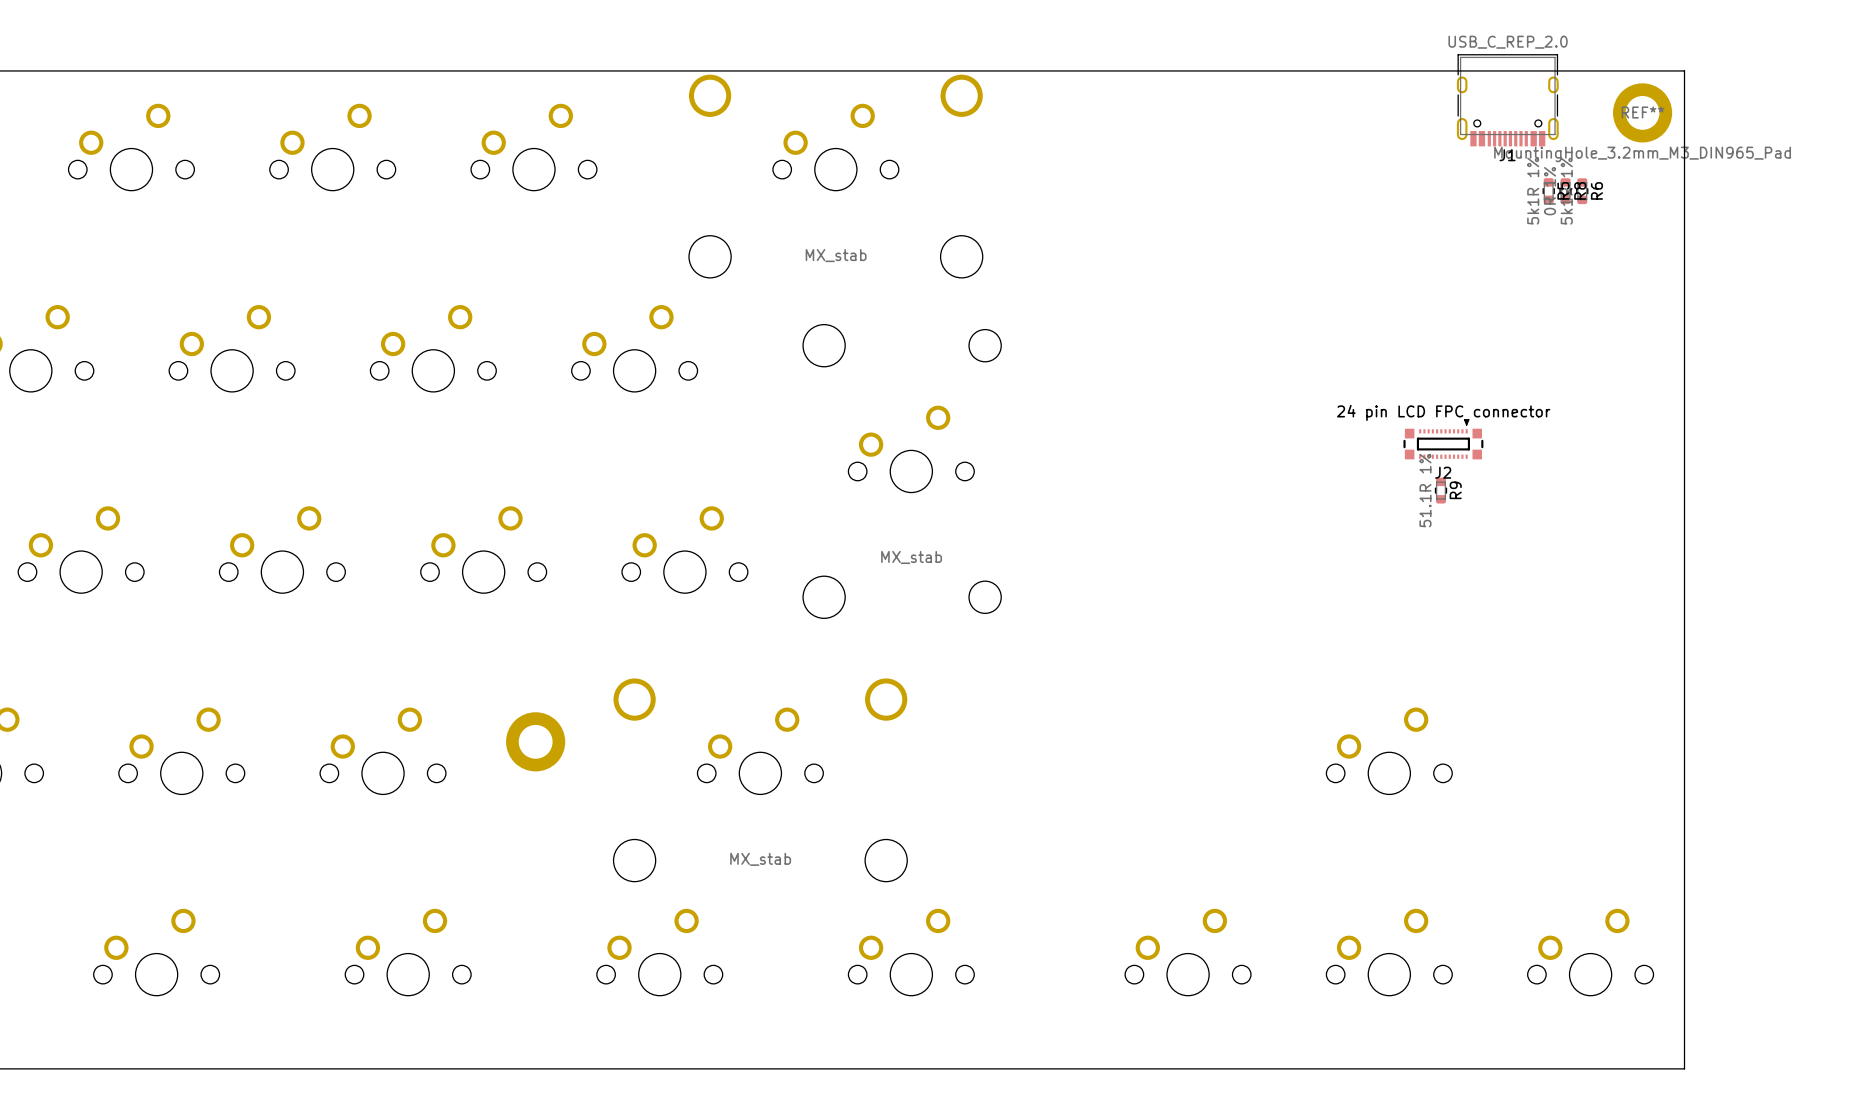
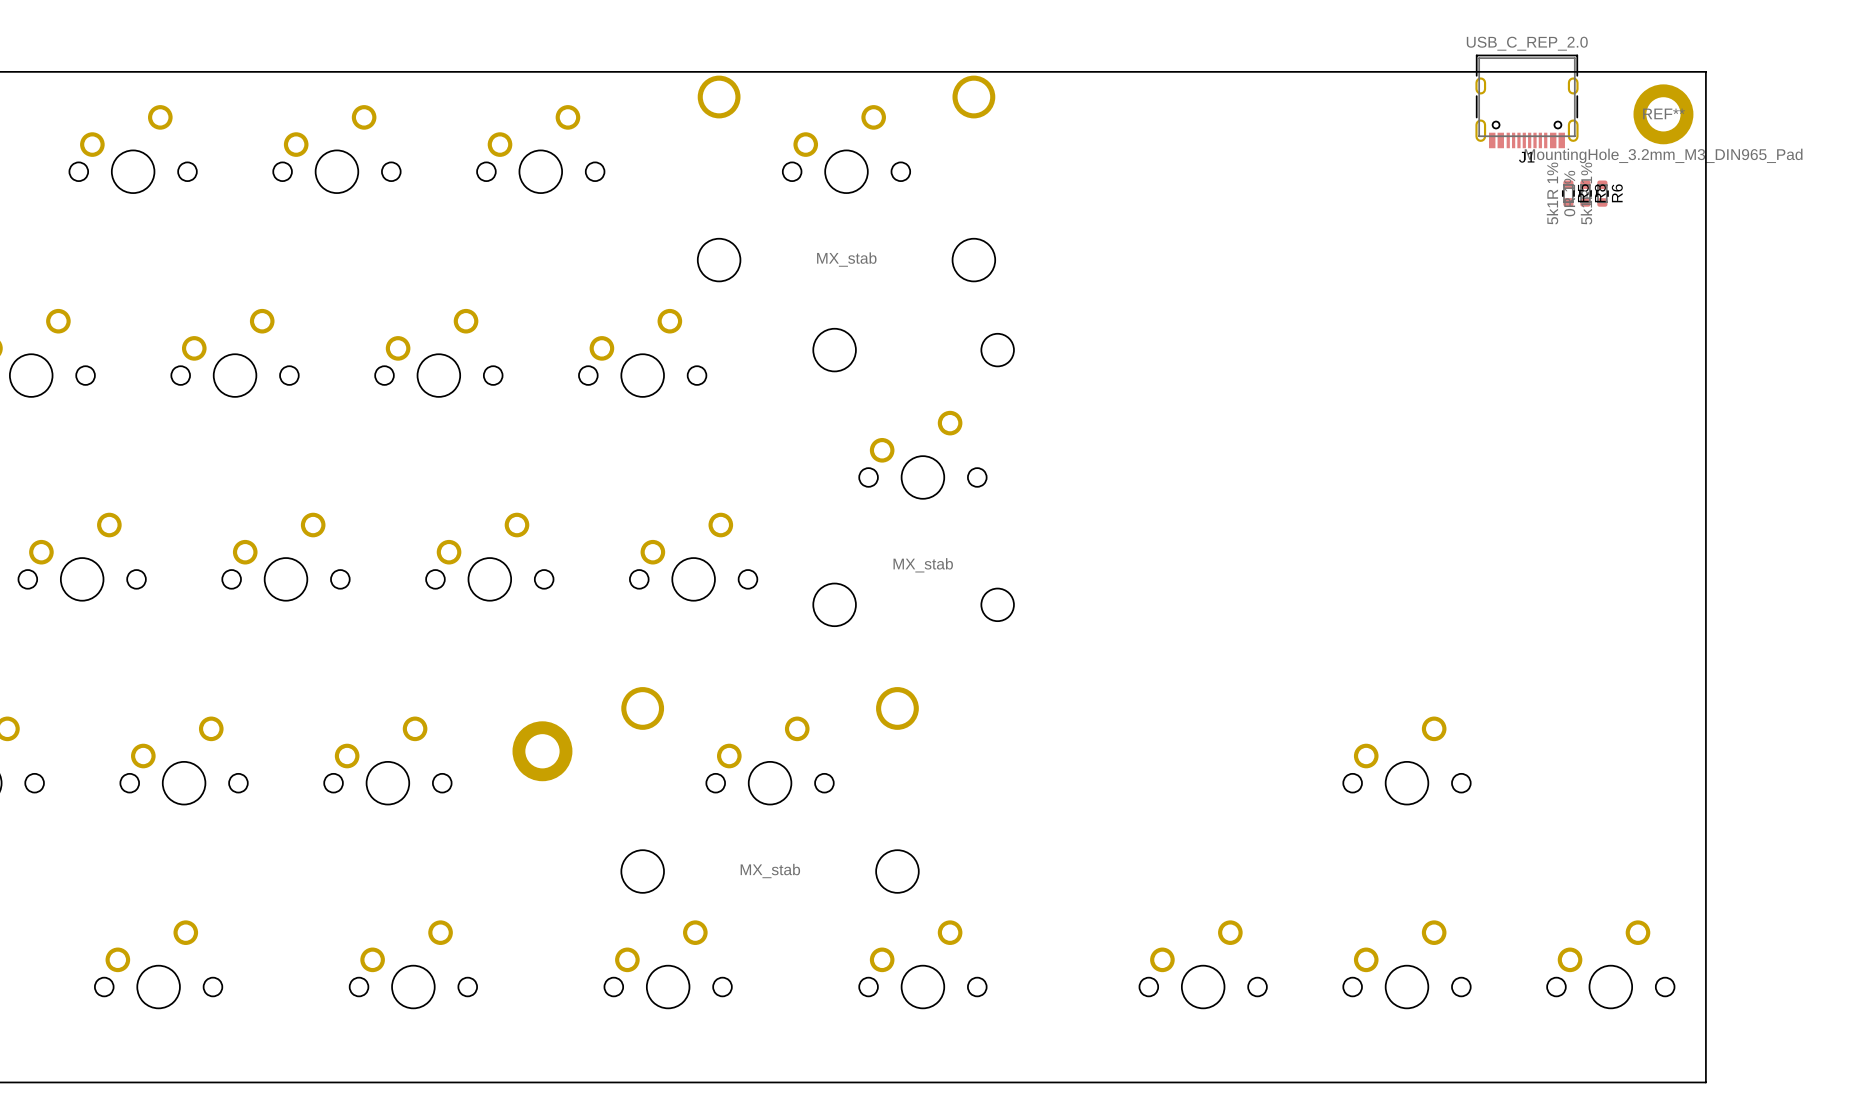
J2: 24 pin LCD FPC connector (1443, 439) -> none
R9: 51.1R 1% (1440, 490) -> none

